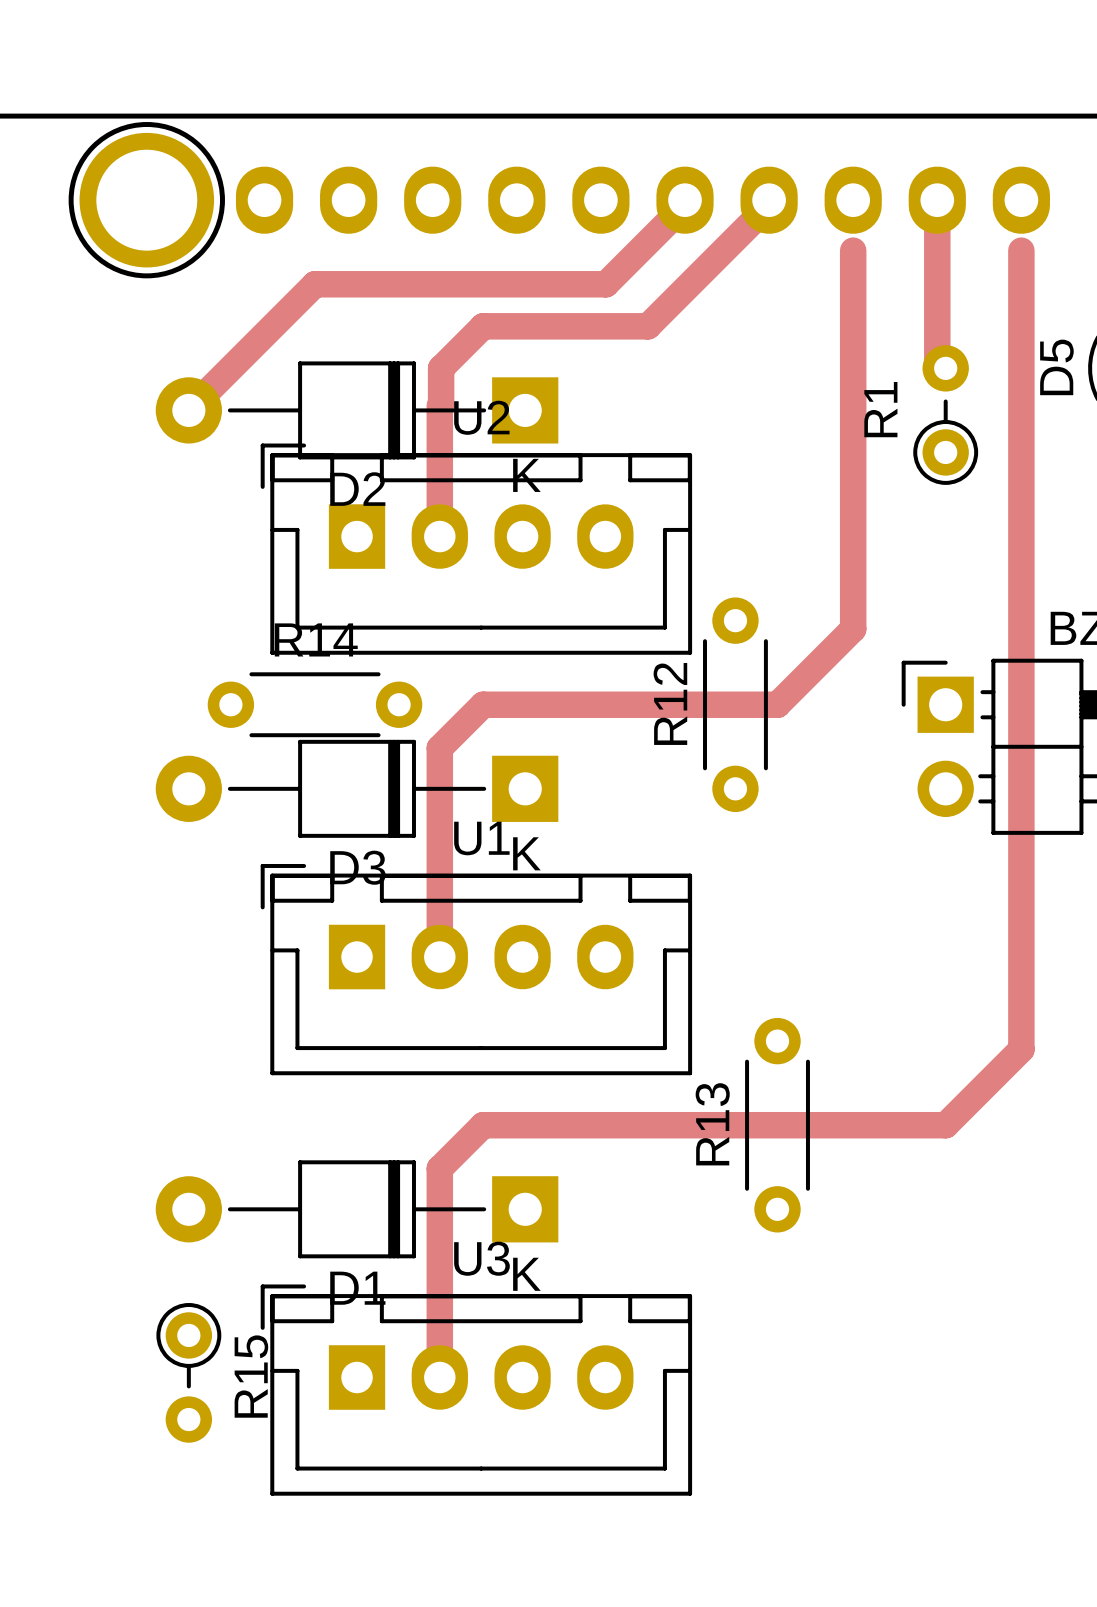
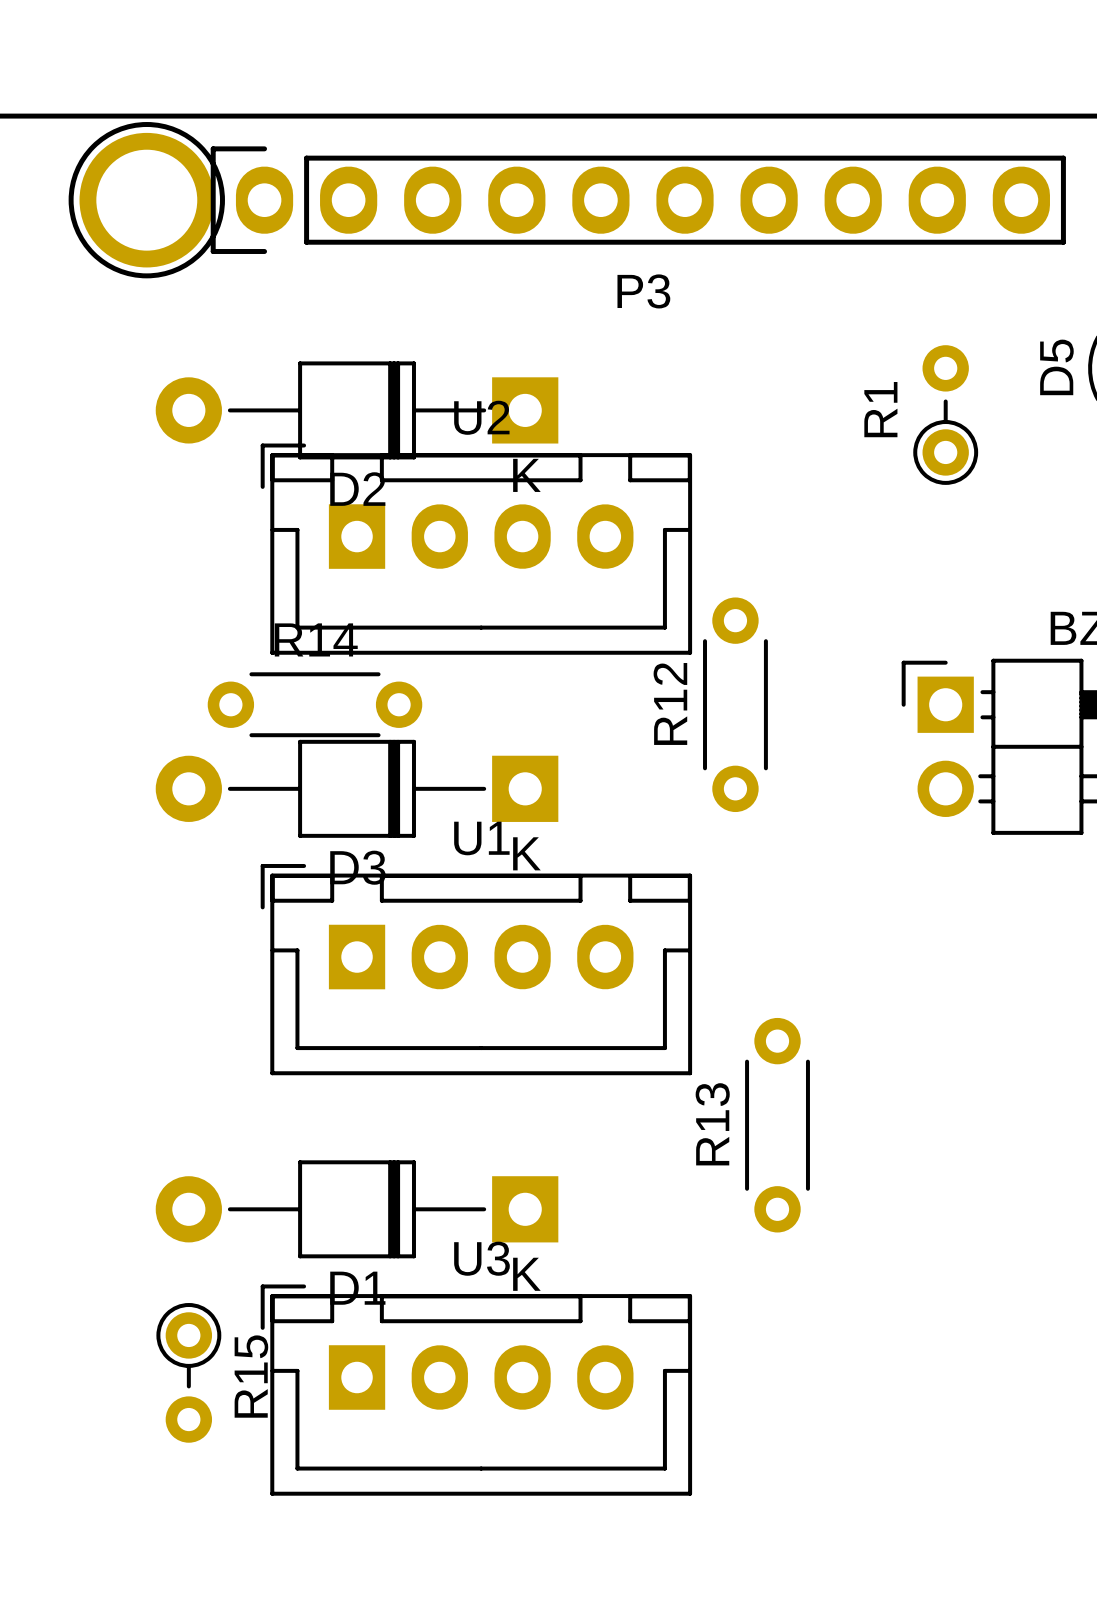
P3 side: bottom (642, 200) -> top (638, 200)
track: (937, 200) (937, 359) -> none
track: (685, 205) (605, 284) (314, 284) (188, 410) -> none
track: (769, 205) (648, 326) (483, 326) (441, 368) (441, 404) -> none
track: (853, 250) (853, 629) (777, 704) (483, 704) (439, 748) (439, 957) -> none
track: (1021, 250) (1021, 1049) (945, 1125) (483, 1125) (439, 1168) (439, 1377) -> none
track: (439, 405) (439, 536) -> none

